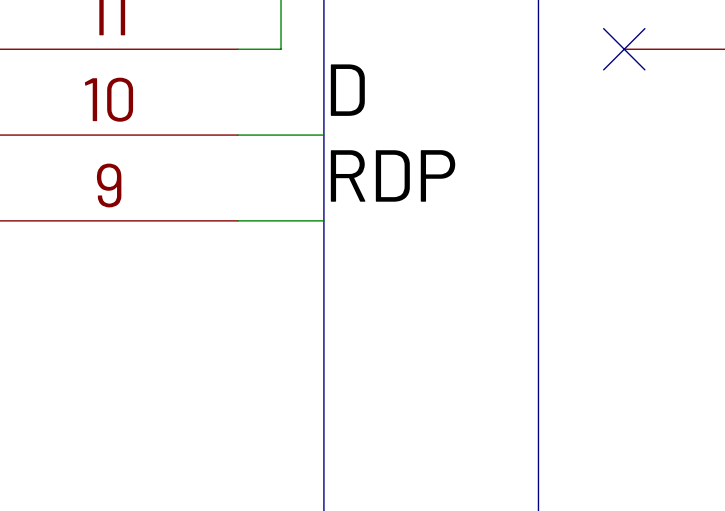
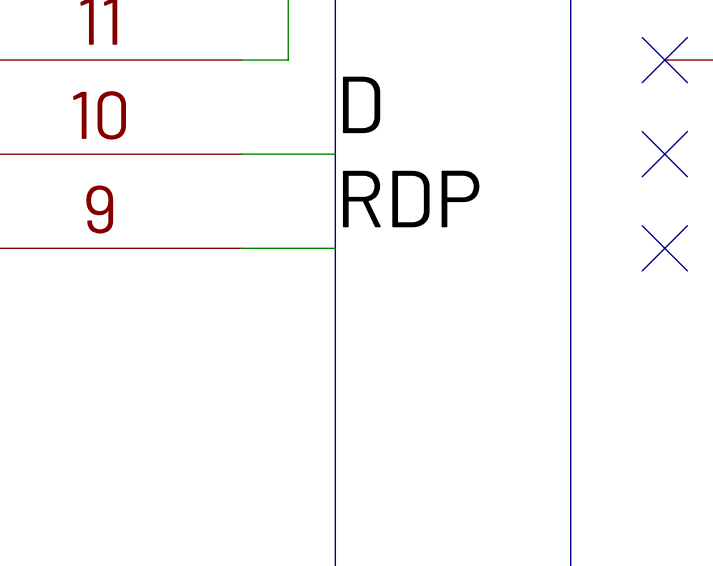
no-connect mark: none -> (664, 154)
no-connect mark: none -> (664, 248)

